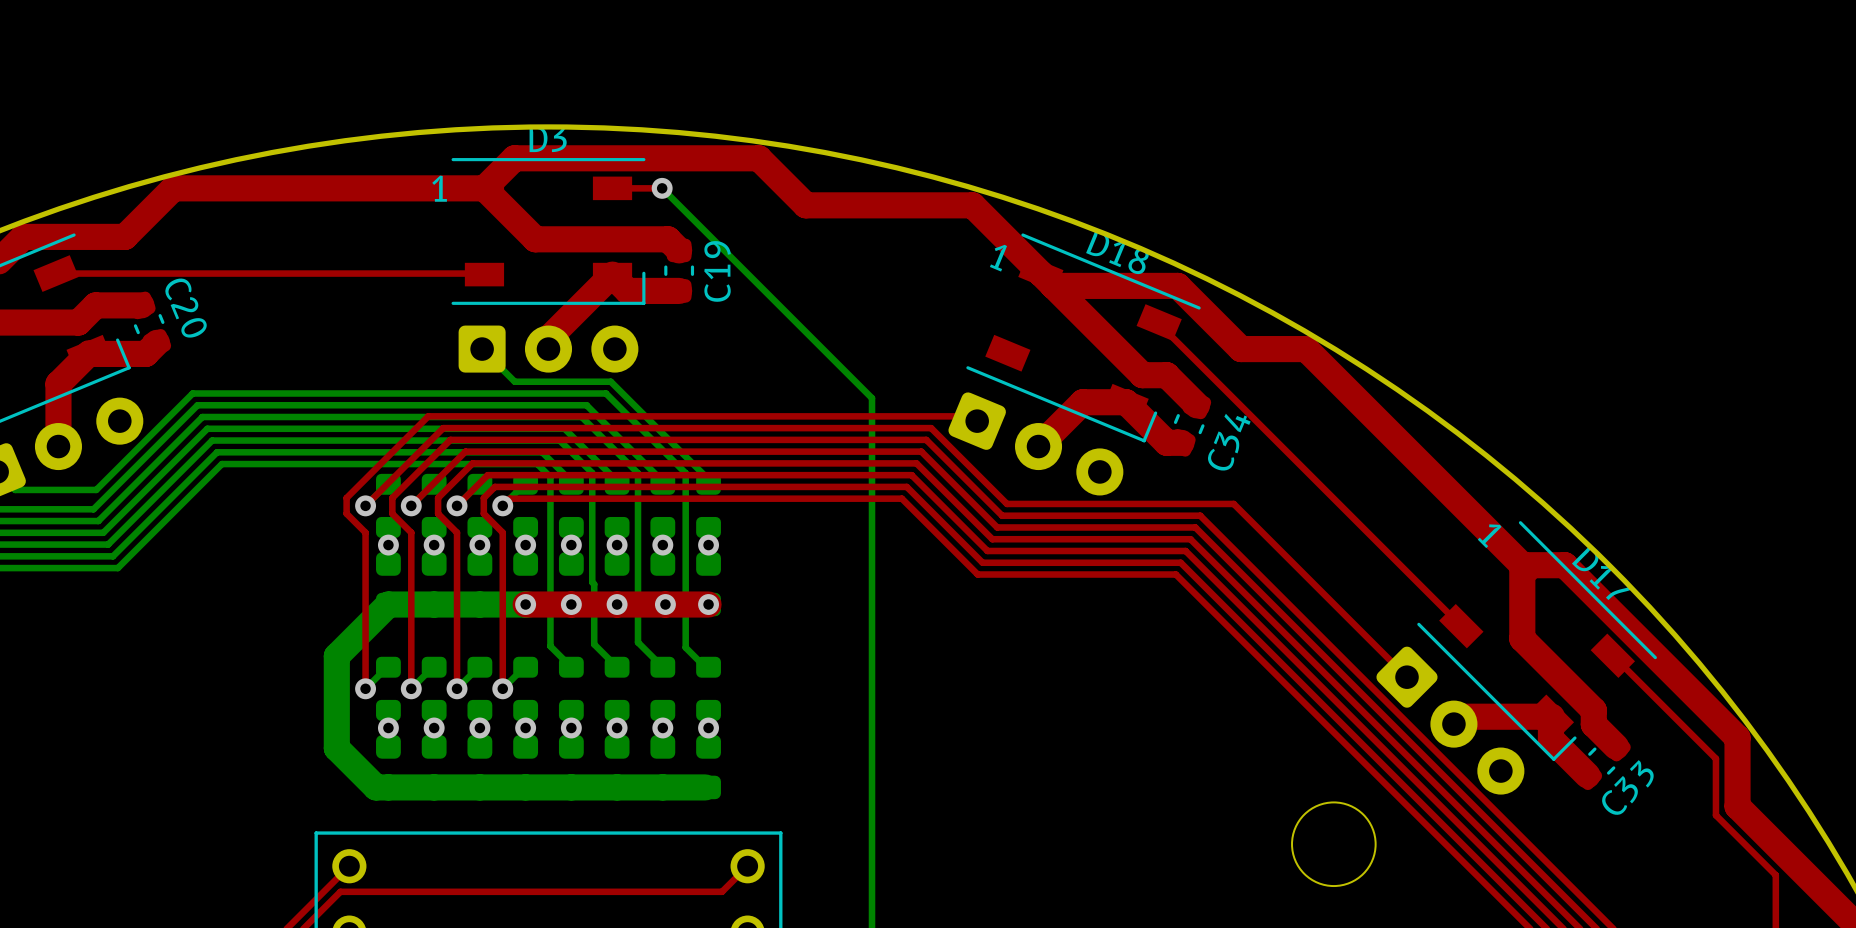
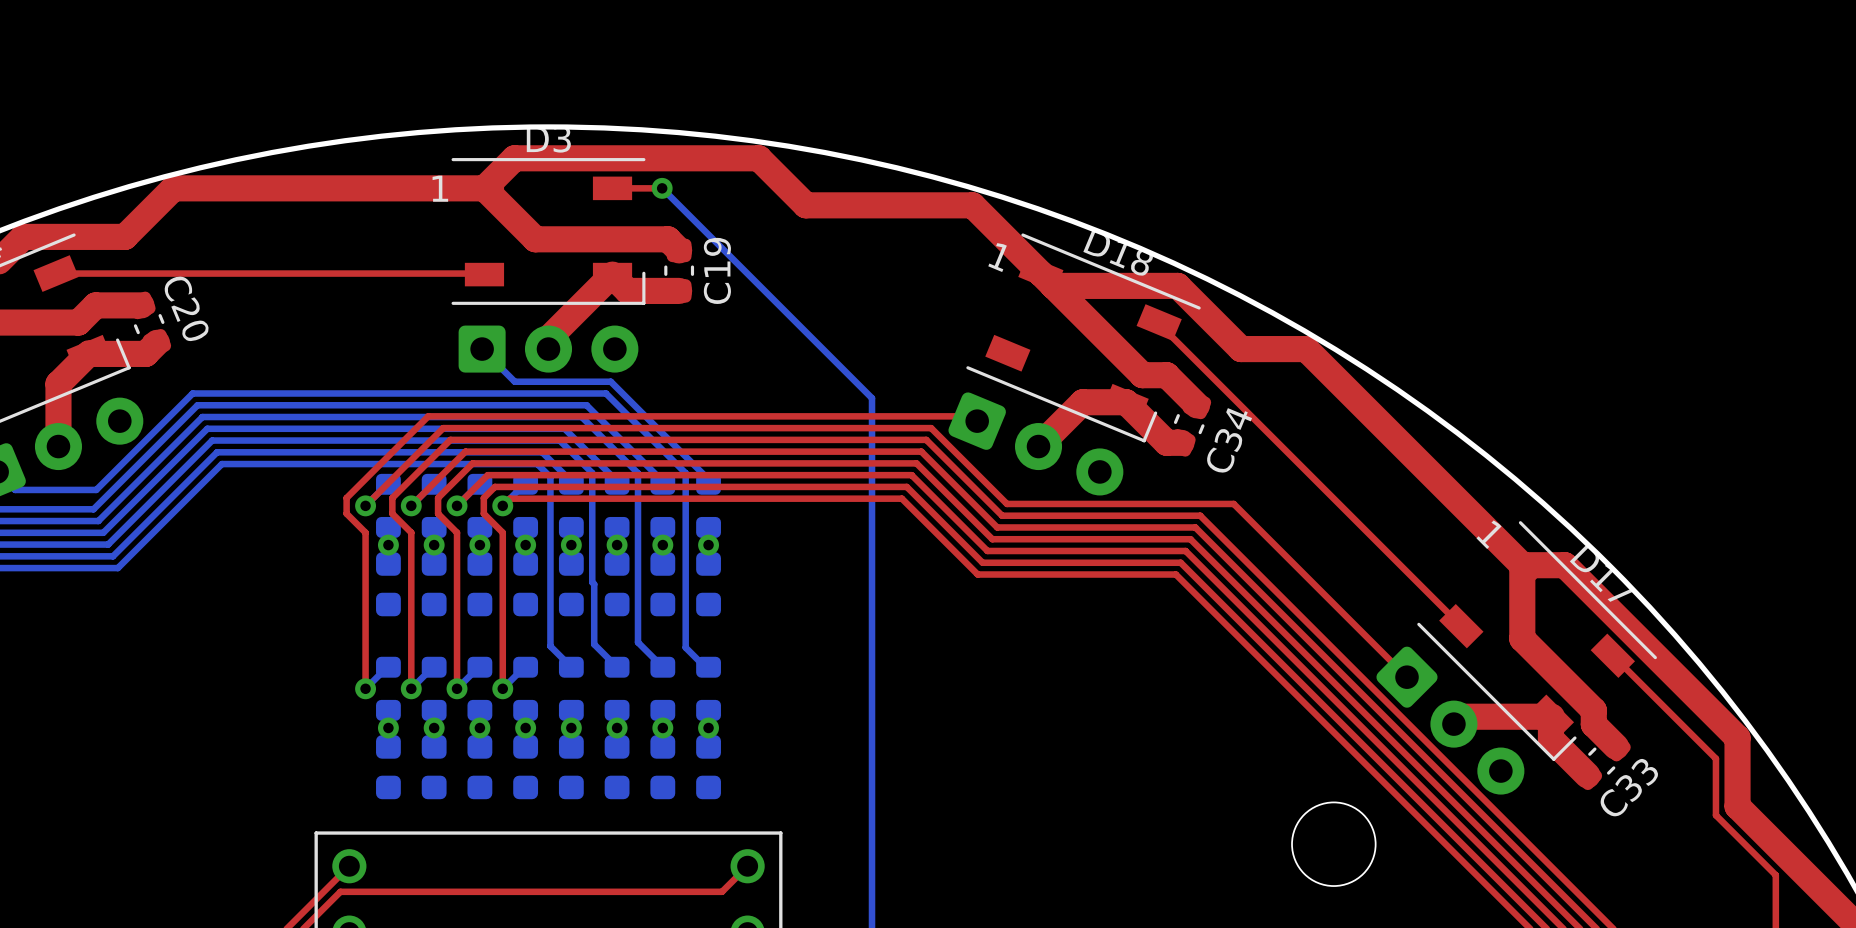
top track: (525, 604) (708, 604) -> none
via: (525, 604) -> none
bottom track: (528, 604) (388, 604) (336, 656) (336, 748) (376, 787) (705, 787) -> none
via: (571, 604) -> none
via: (617, 604) -> none
via: (665, 604) -> none
via: (708, 604) -> none

